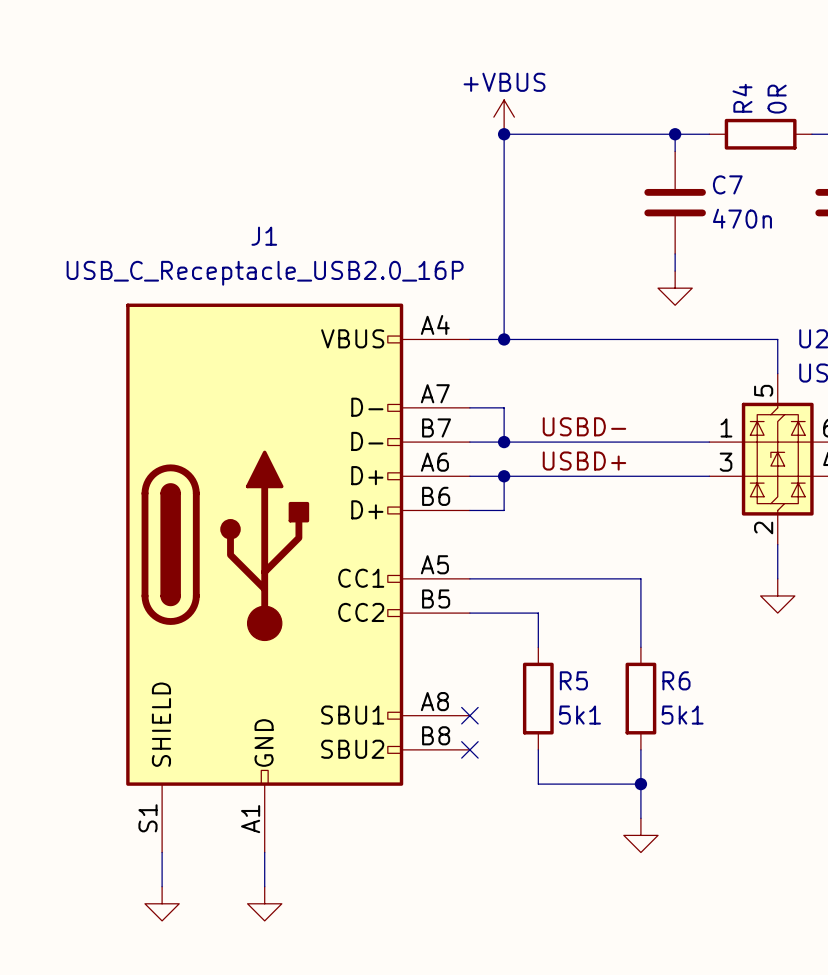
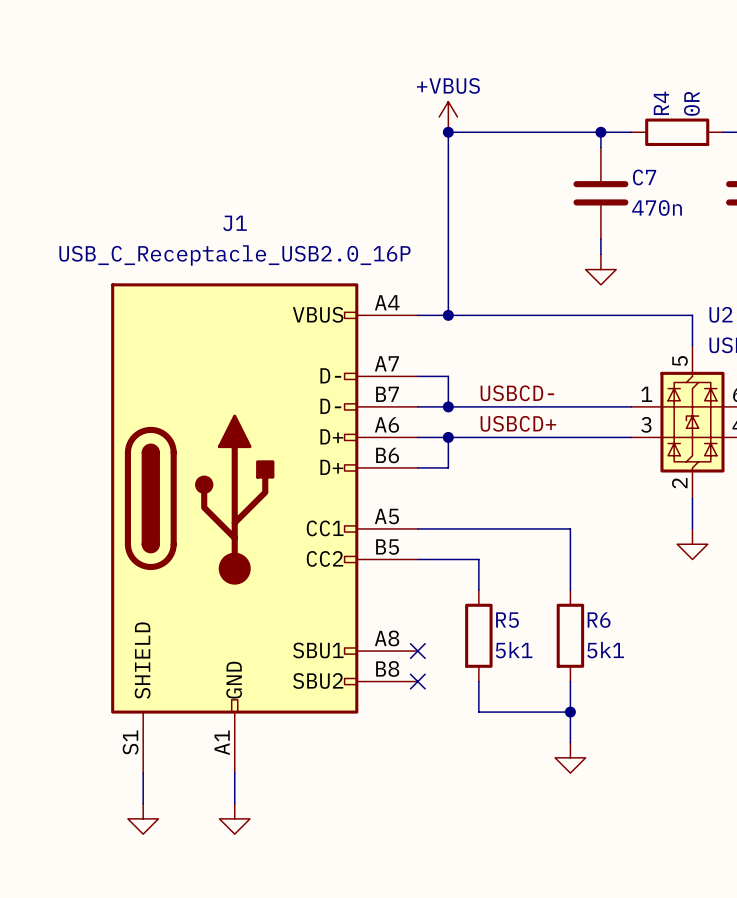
label: USBD- (584, 426) -> USBCD- (517, 393)
label: USBD+ (584, 461) -> USBCD+ (518, 423)

